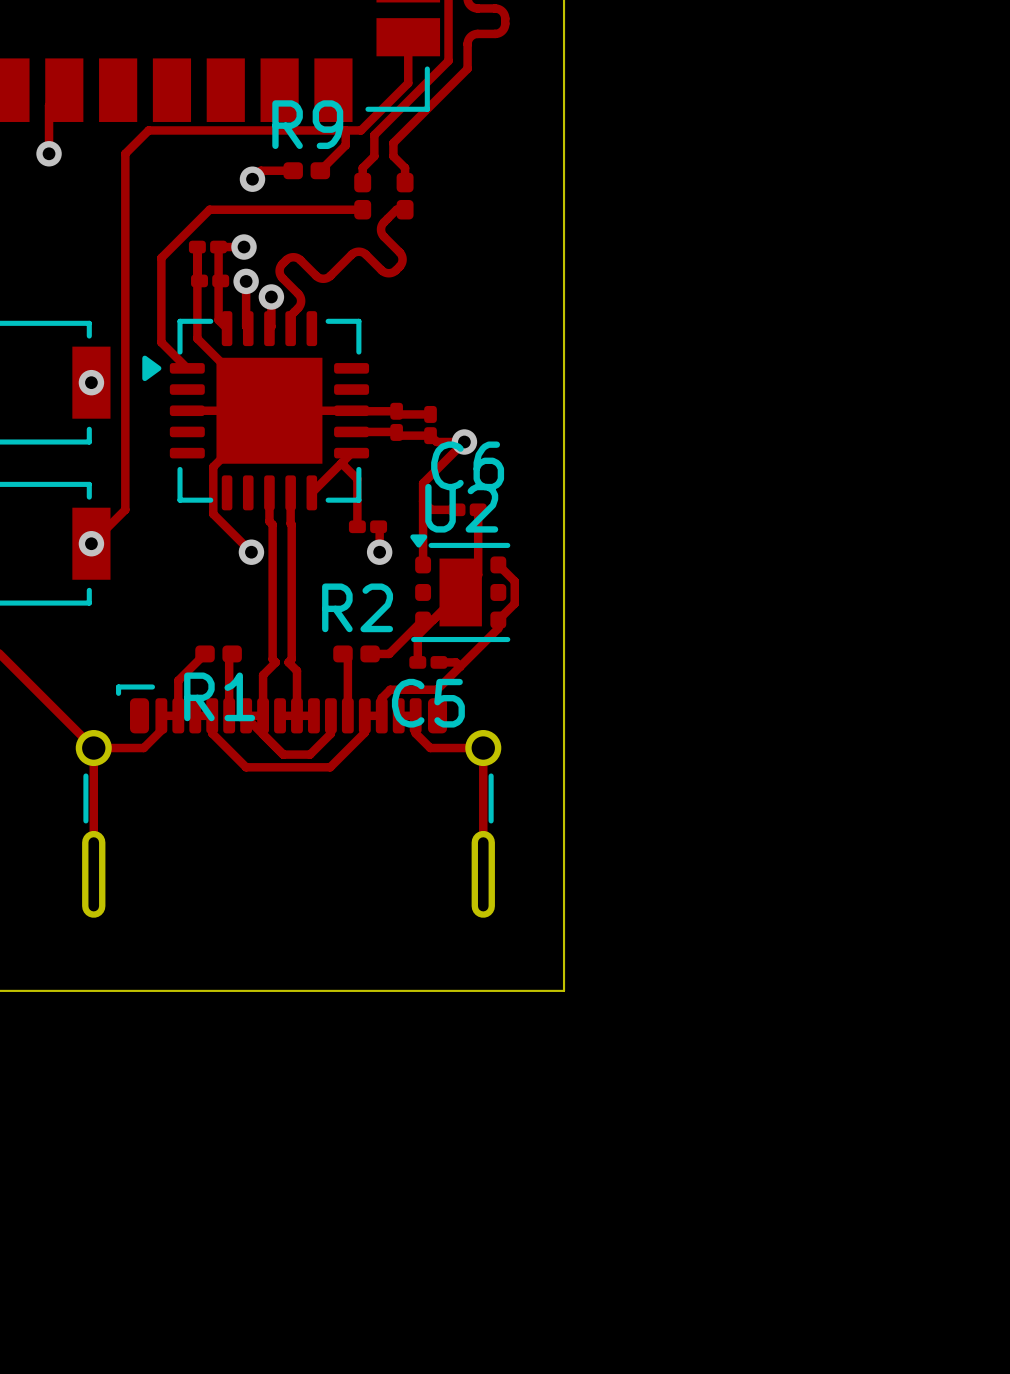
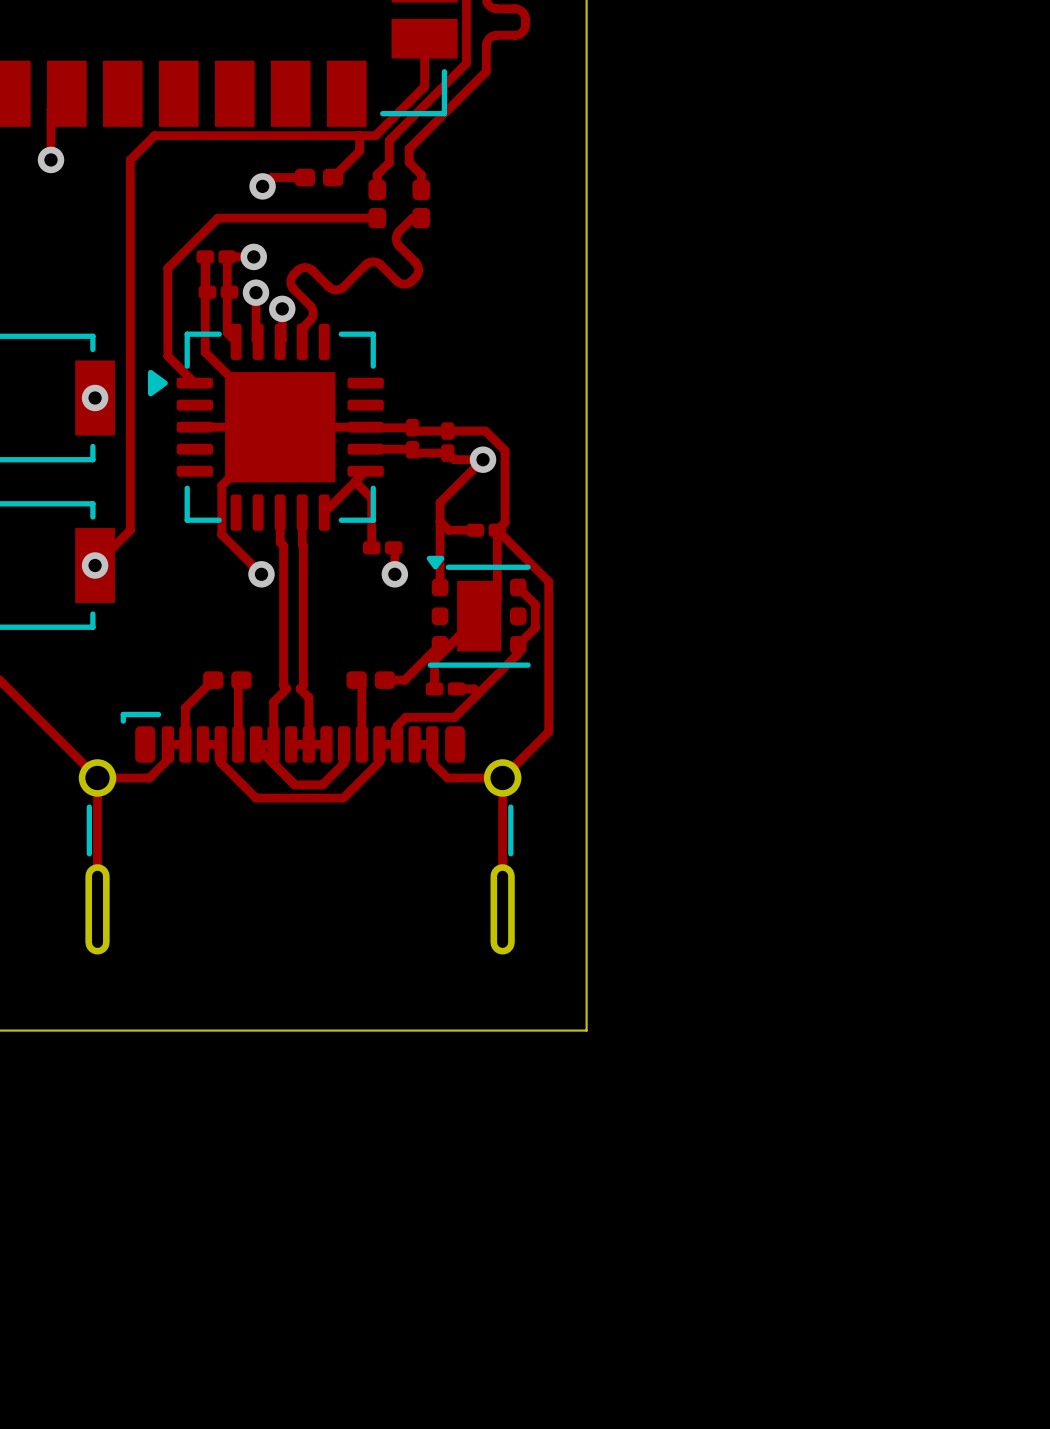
R9 name: R9 (307, 124) -> none
track: none -> (447, 431) (485, 431) (505, 450) (505, 522) (497, 530) (548, 581) (548, 731) (502, 777)
C6 name: C6 (467, 465) -> none
U2 name: U2 (461, 508) -> none
R2 name: R2 (357, 607) -> none
R1 name: R1 (219, 696) -> none
C5 name: C5 (428, 703) -> none

